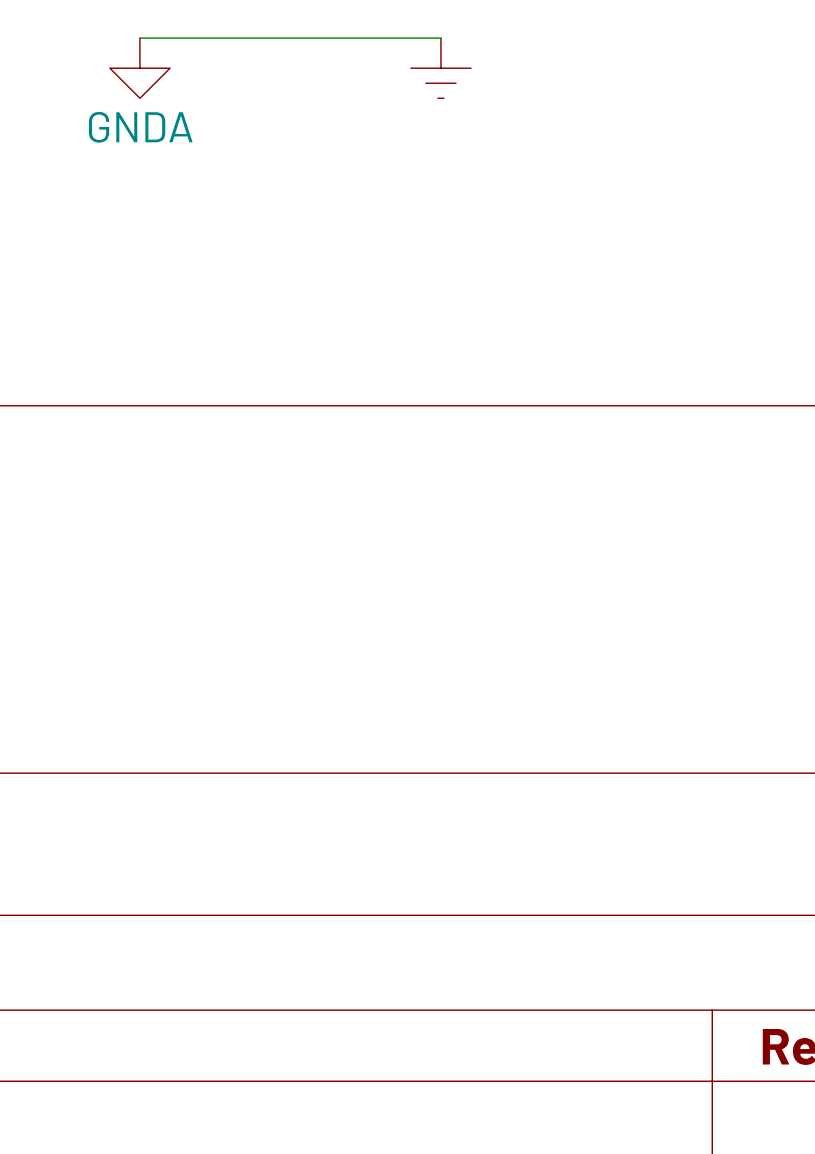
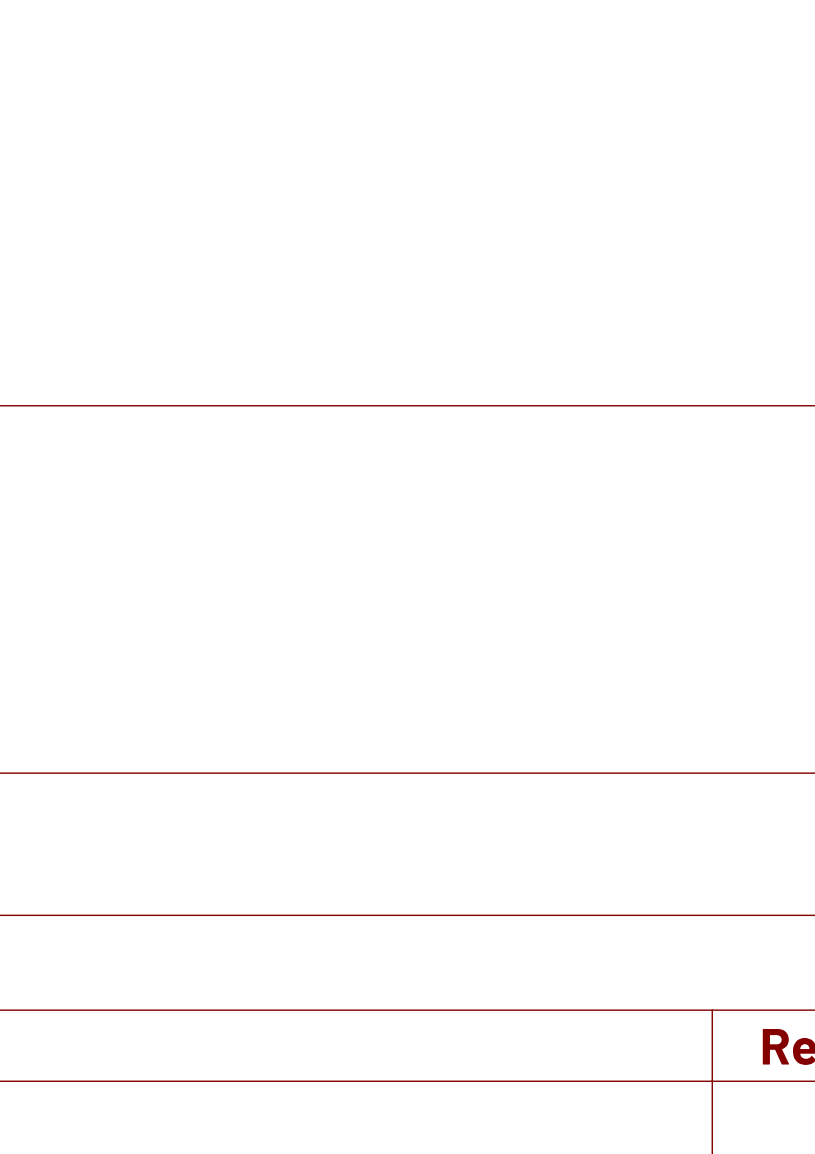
wire: (139, 38) (440, 38) -> none
power symbol: GNDA (139, 68) -> none
power symbol: (440, 68) -> none

